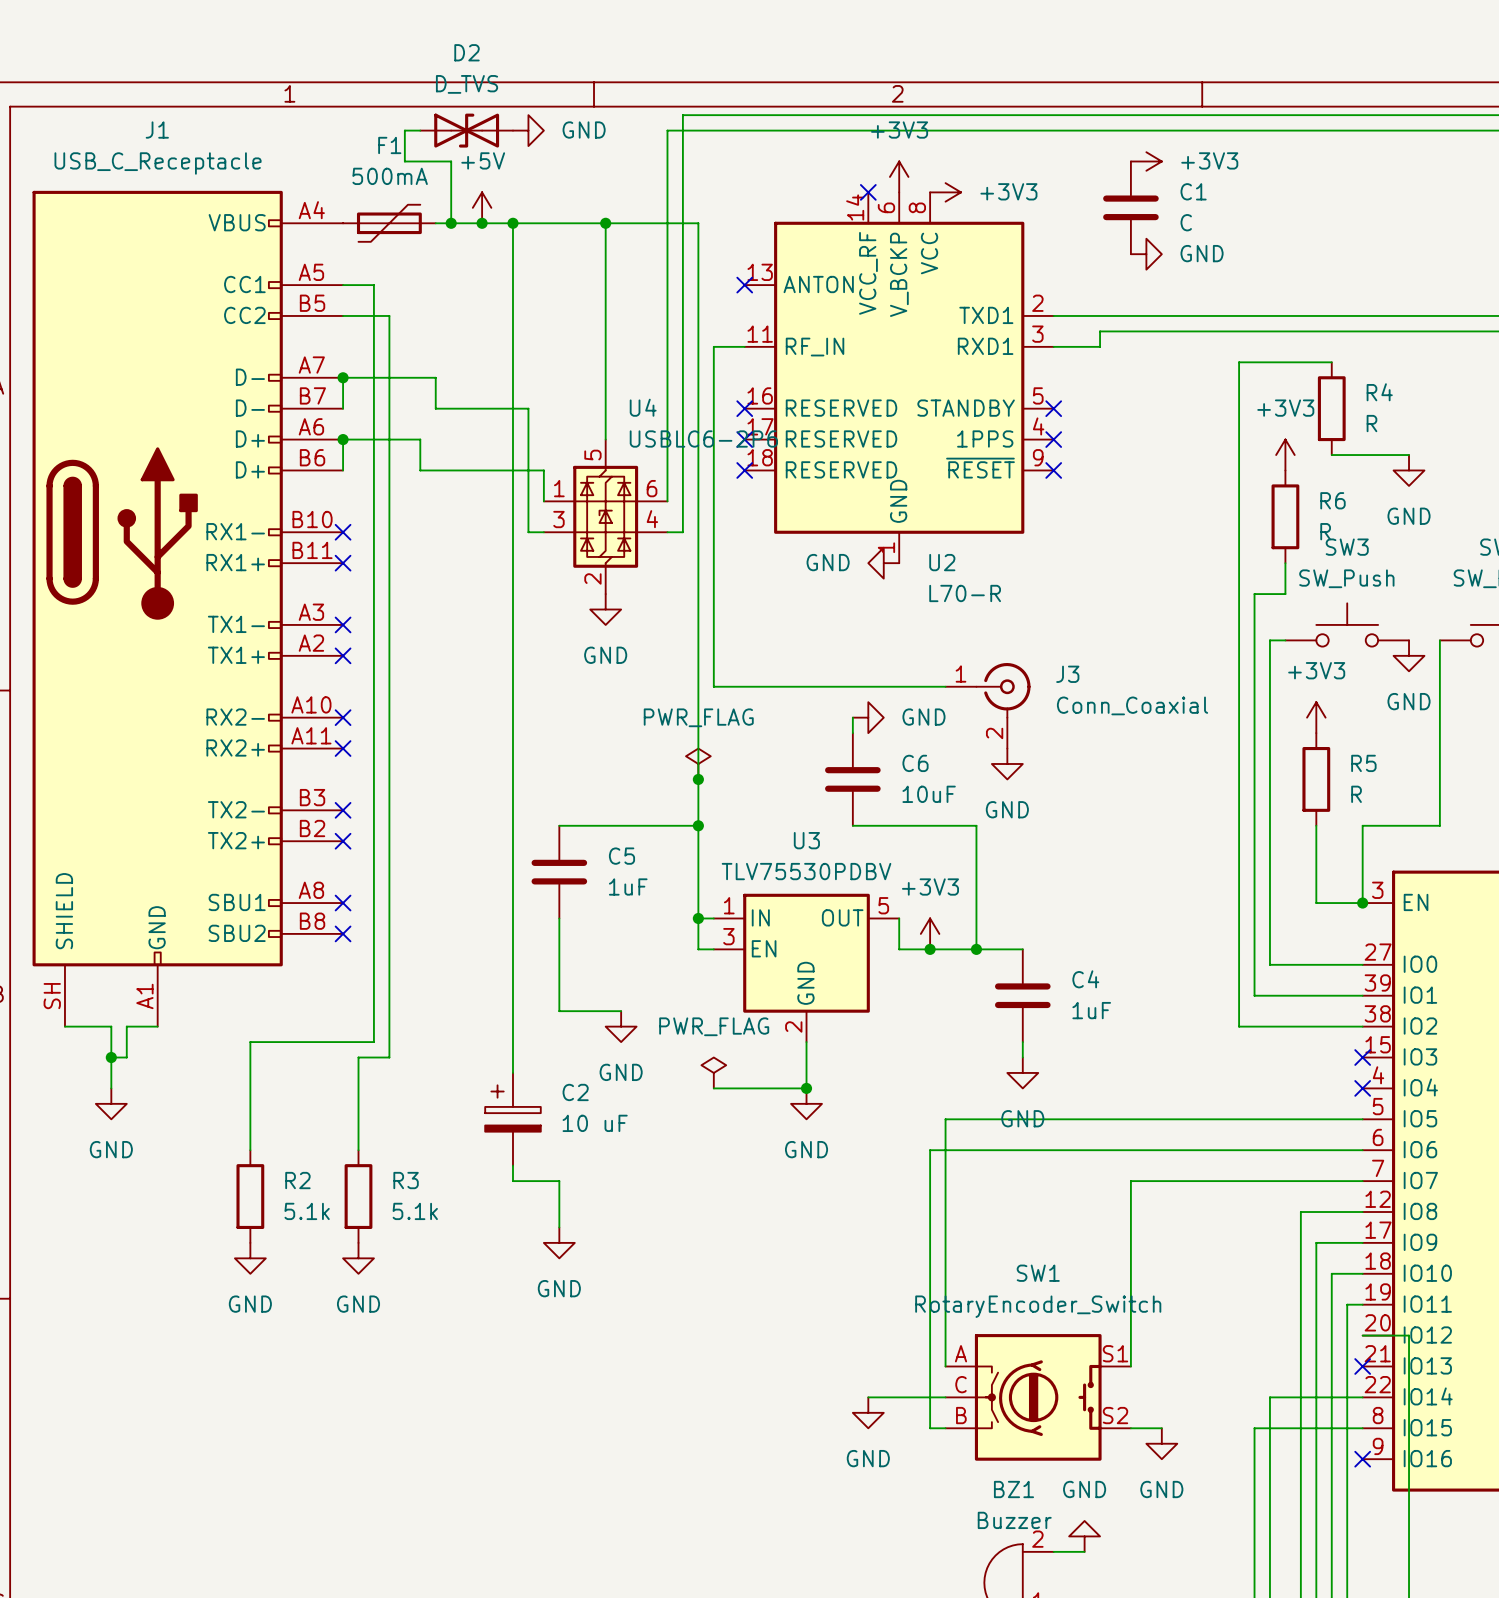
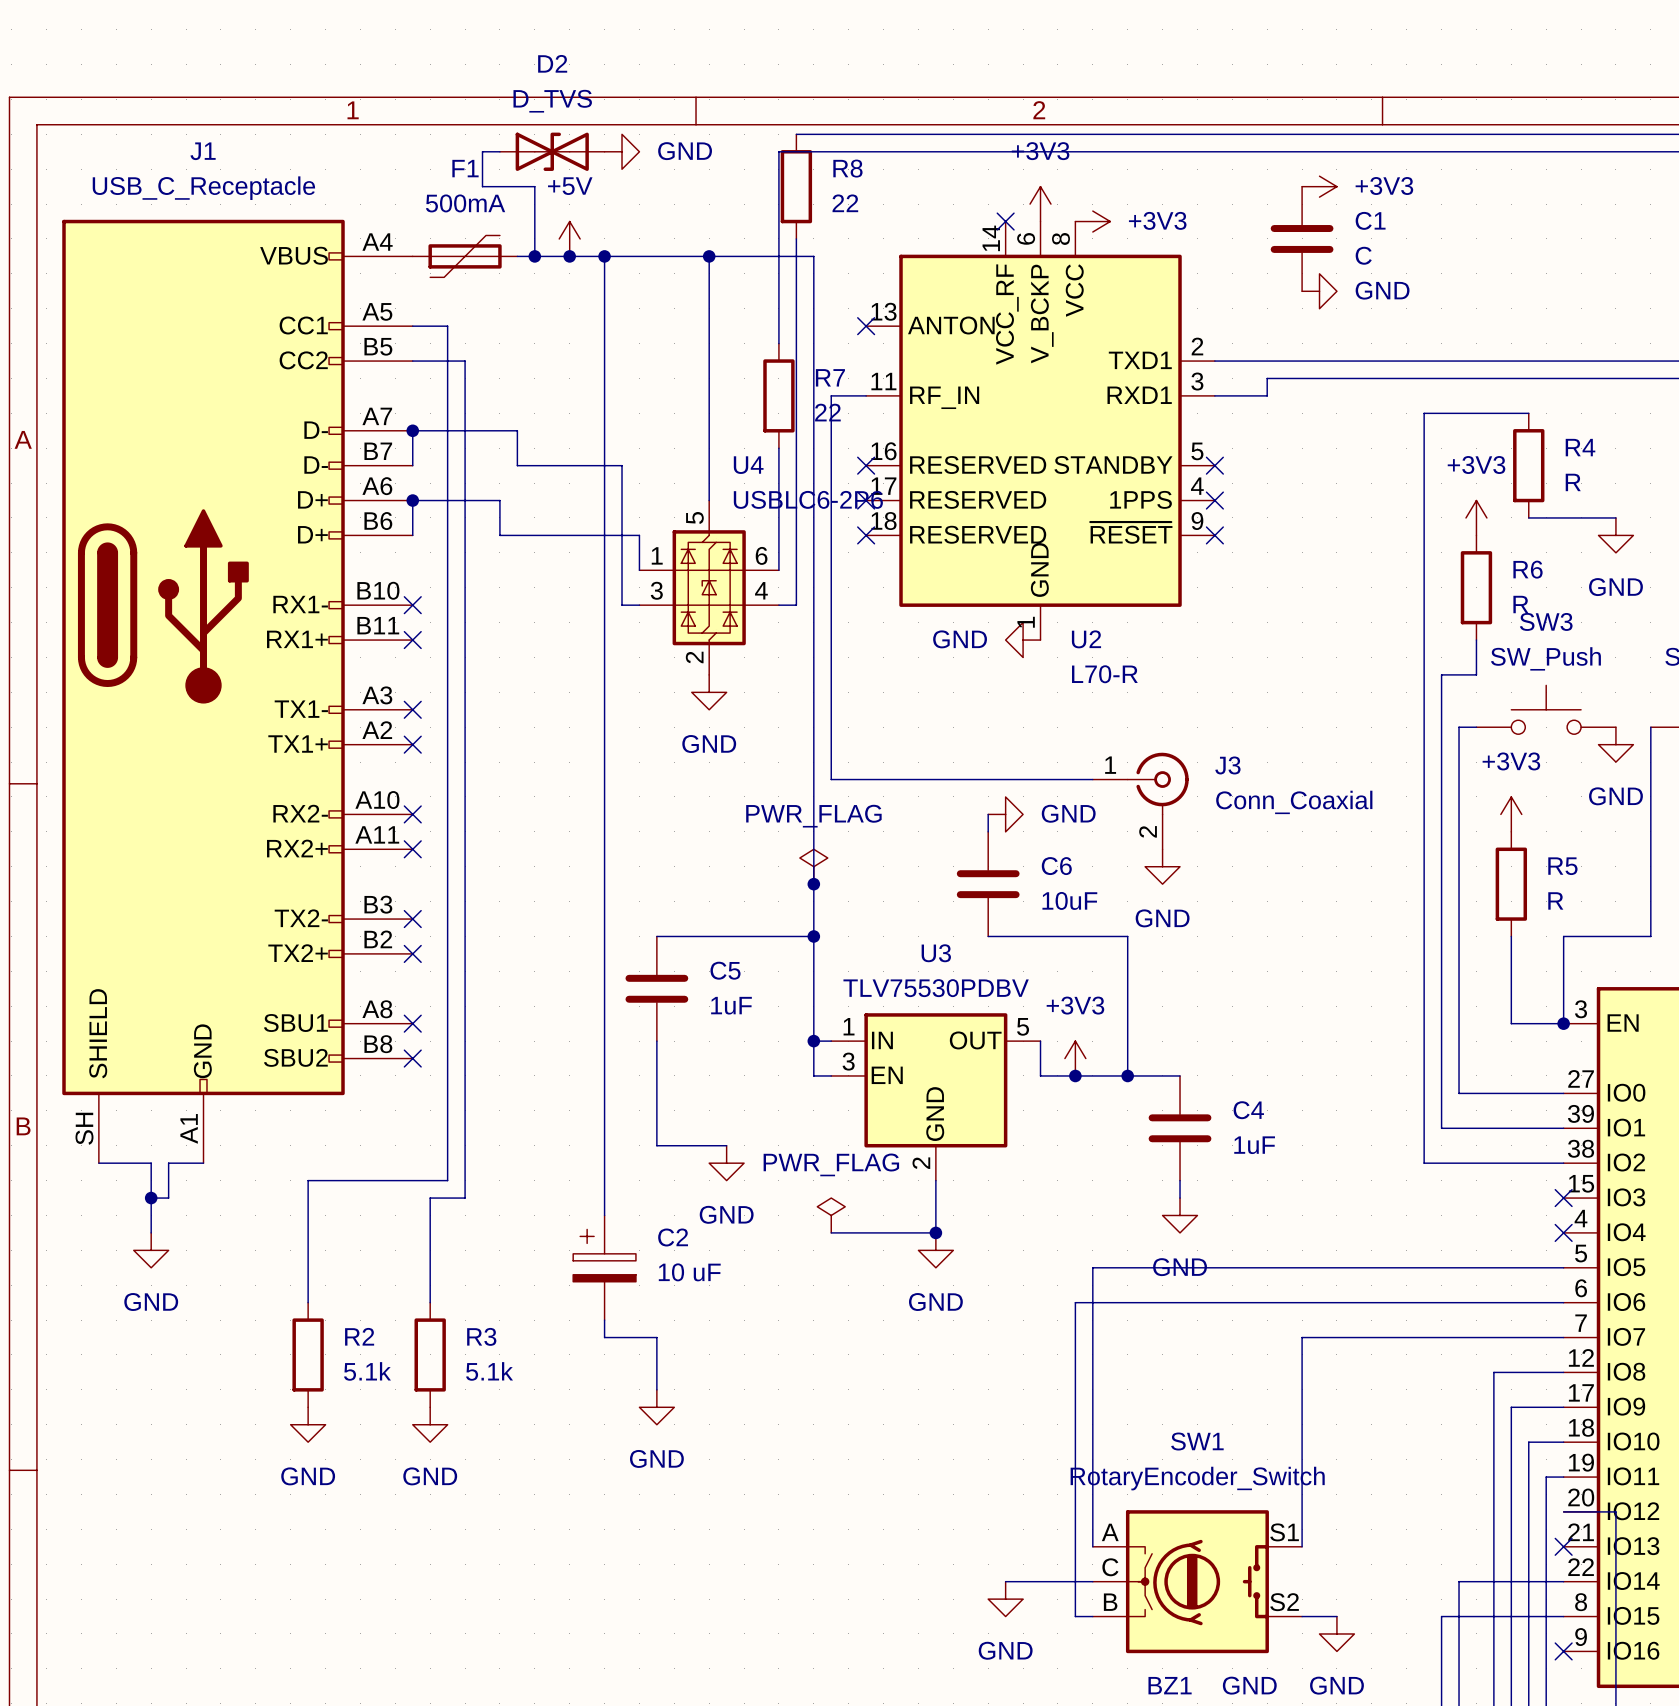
wire: (682, 115) (682, 207) -> none
R8: none -> 22 (796, 186)
wire: (667, 300) (667, 393) -> none
R7: none -> 22 (778, 395)

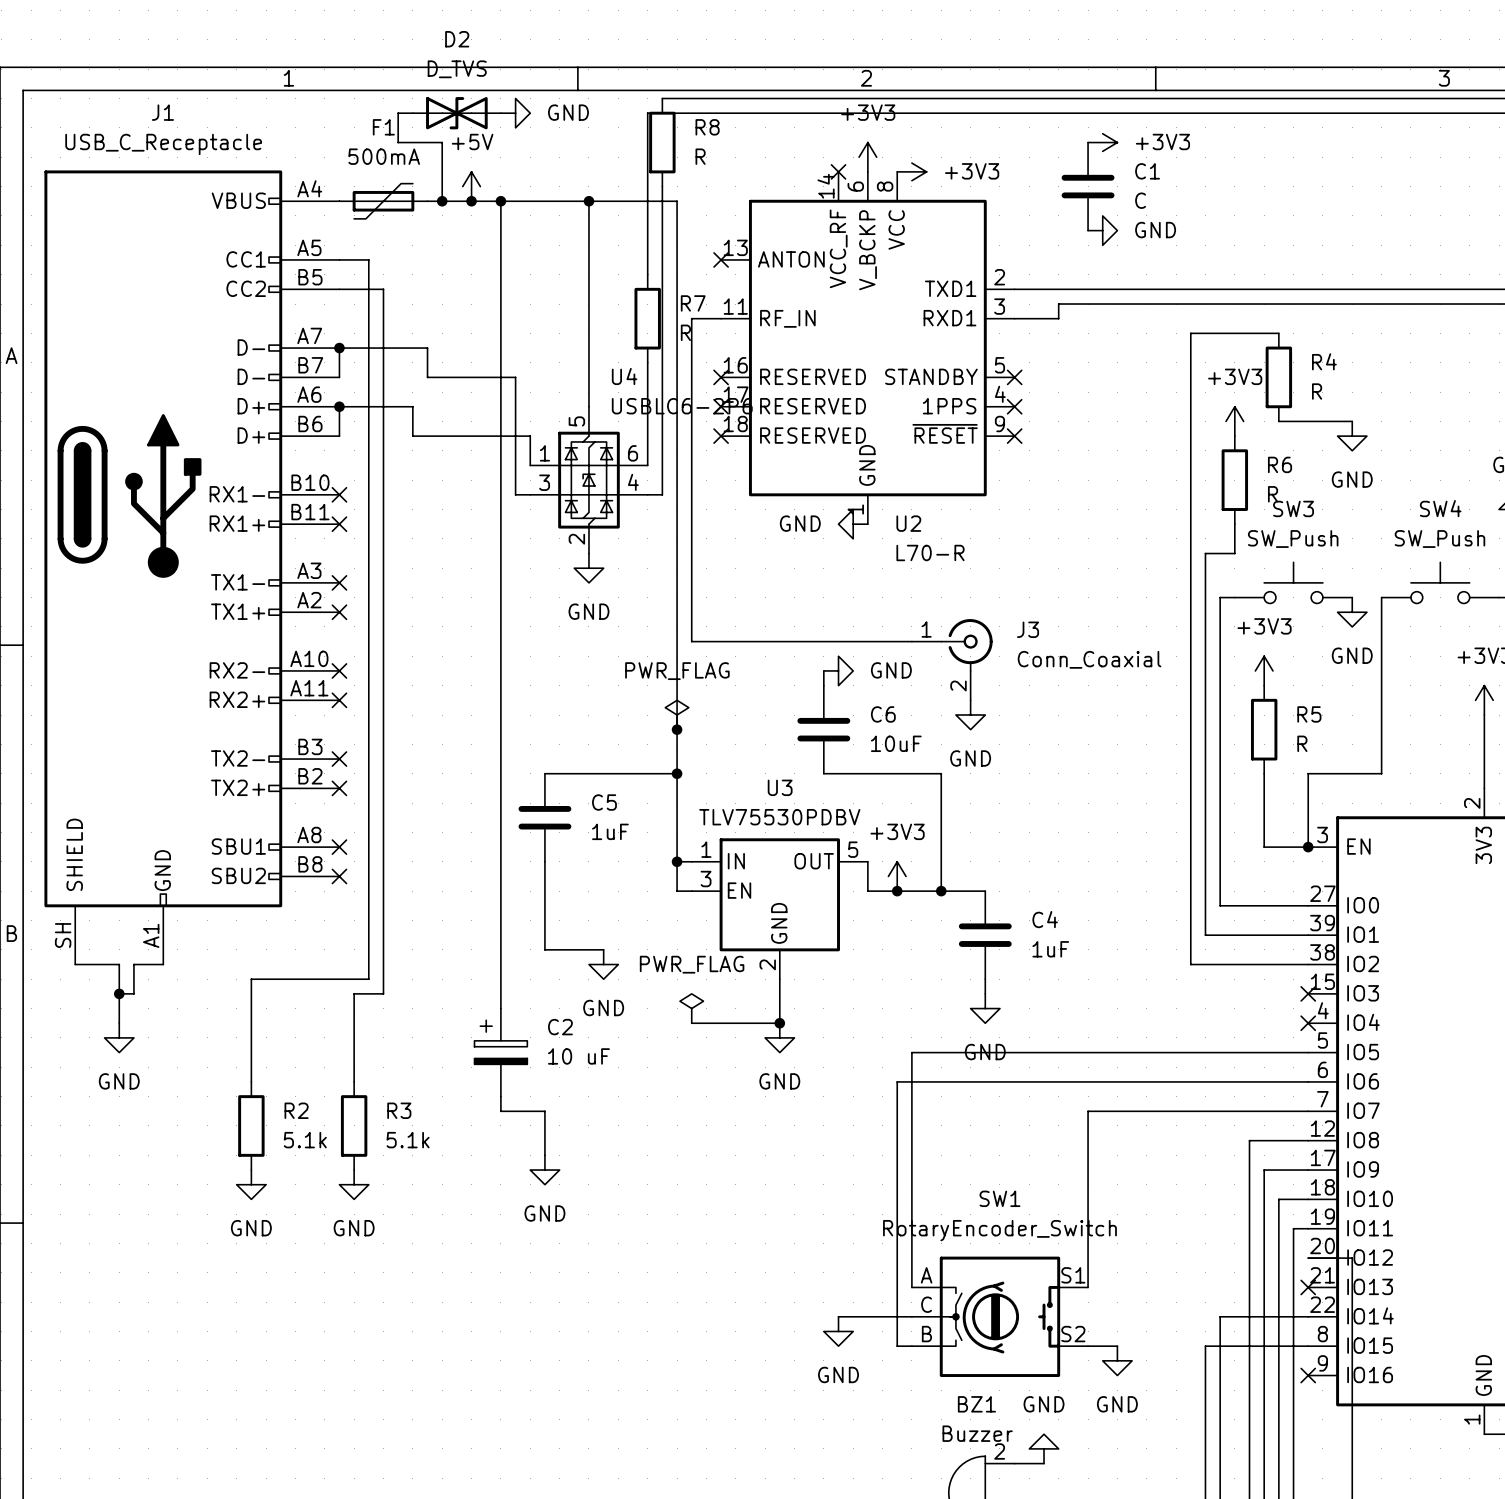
R8 value: 22 (845, 203) -> R (700, 156)
R7 value: 22 (827, 412) -> R (685, 332)

